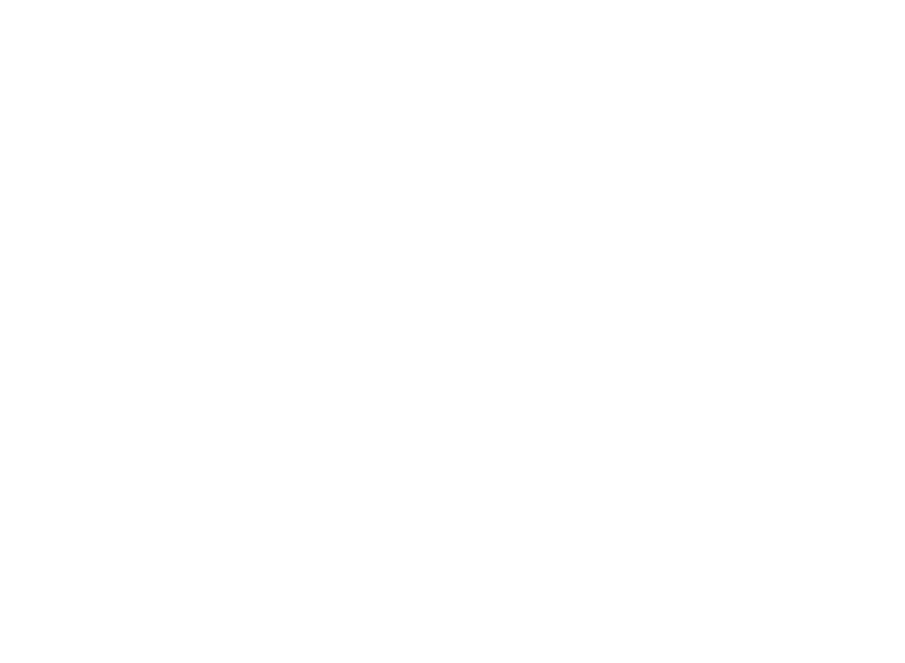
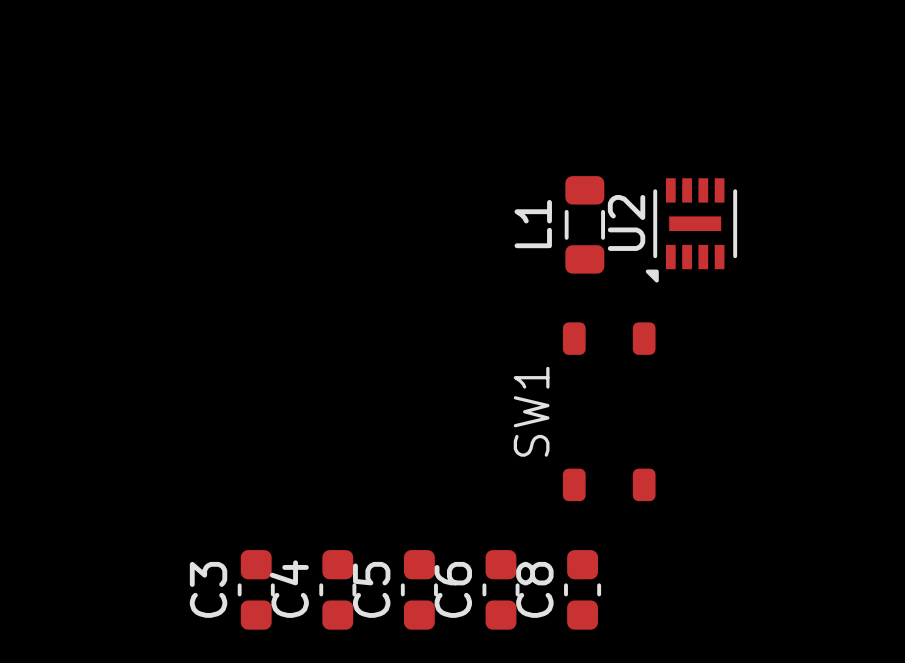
L1: none -> (584, 224)
U2: none -> (691, 230)
SW1: none -> (609, 411)
C3: none -> (256, 589)
C4: none -> (337, 589)
C5: none -> (419, 589)
C6: none -> (500, 589)
C8: none -> (582, 589)

